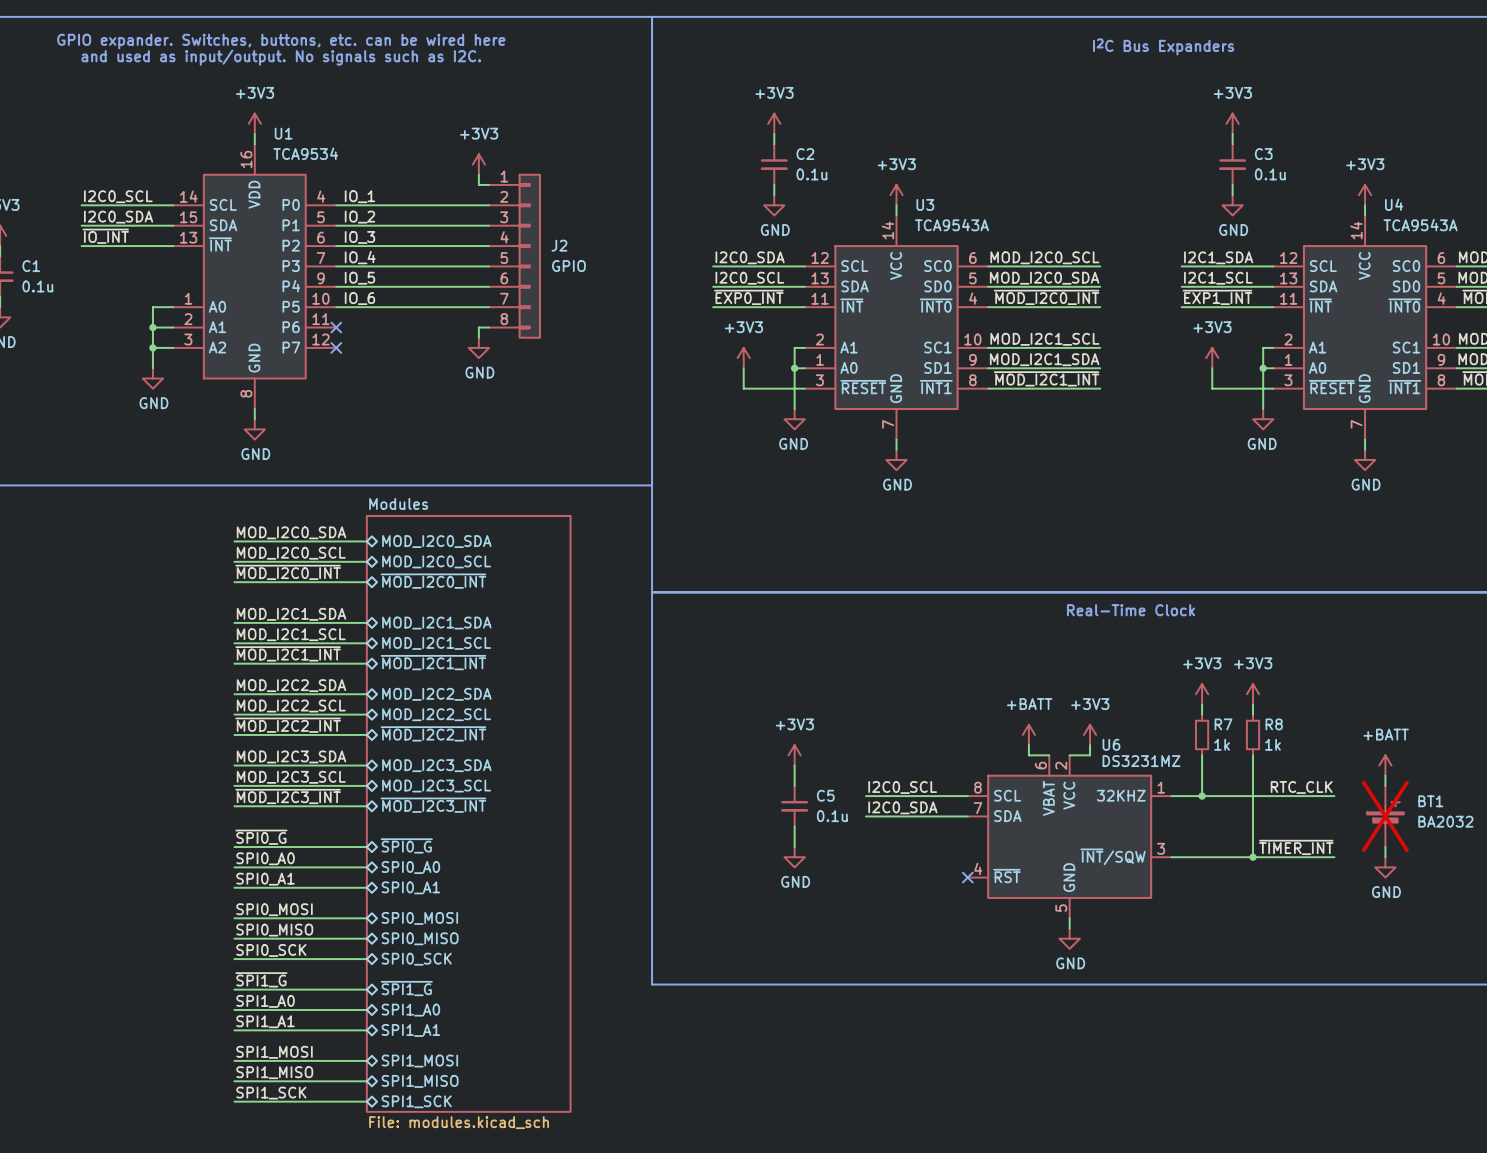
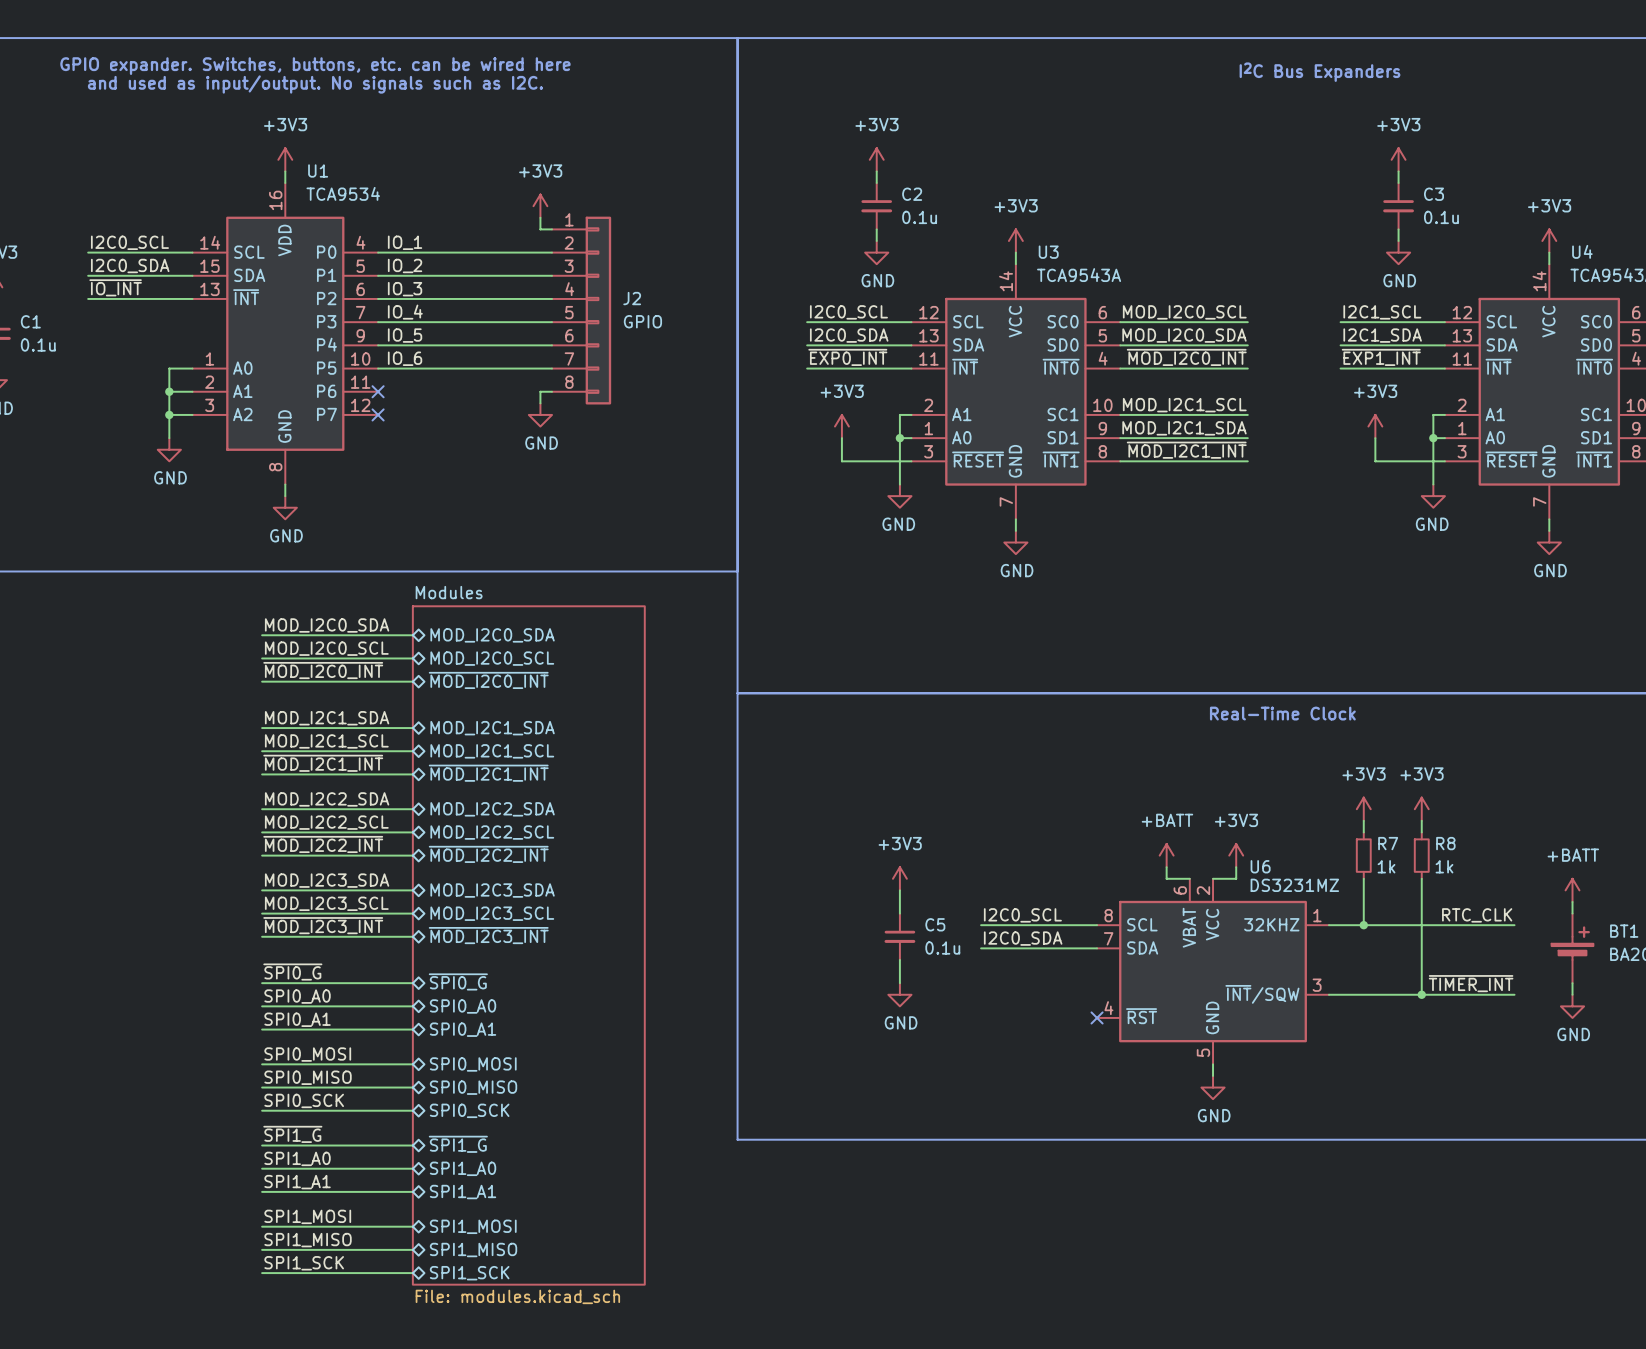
label: I2C0_SDA (750, 257) -> I2C0_SCL (848, 312)
label: I2C1_SDA (1218, 257) -> I2C1_SCL (1382, 312)
label: I2C0_SCL (749, 278) -> I2C0_SDA (849, 335)
label: I2C1_SCL (1218, 278) -> I2C1_SDA (1382, 335)
BT1 do-not-place cross: (1385, 816) -> none

